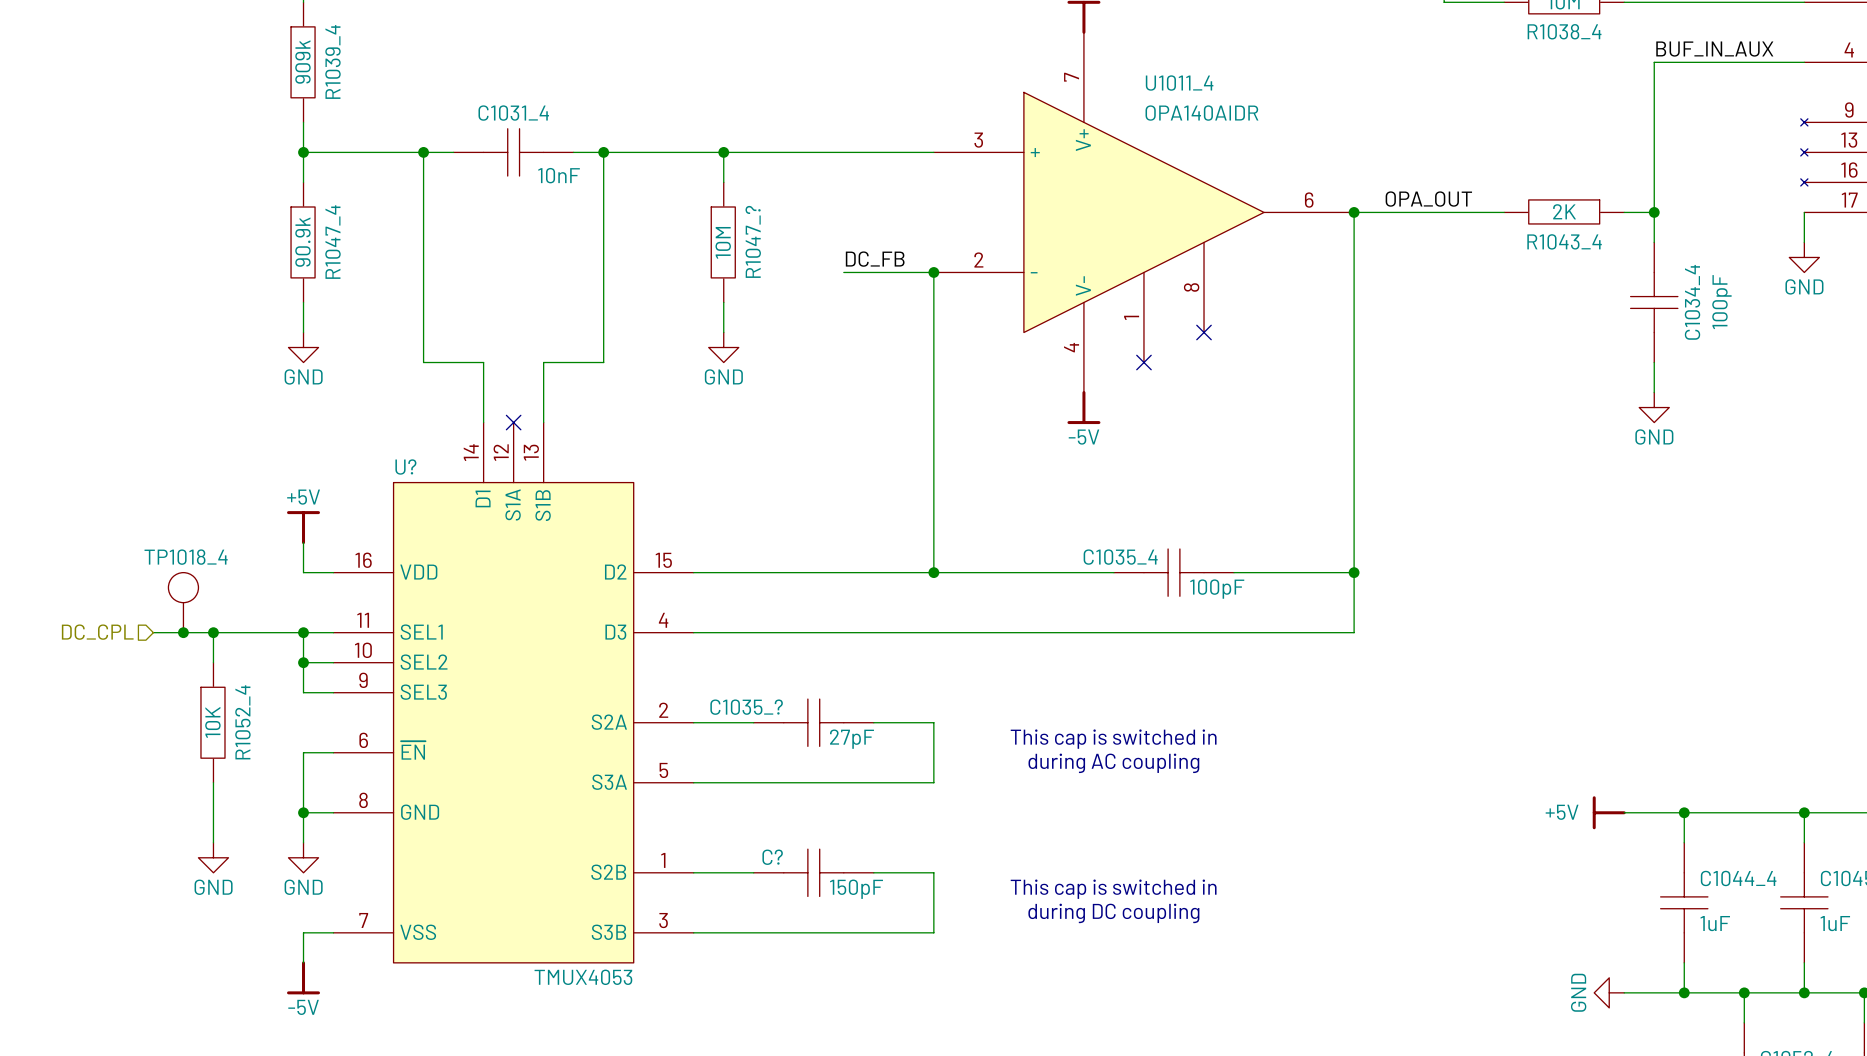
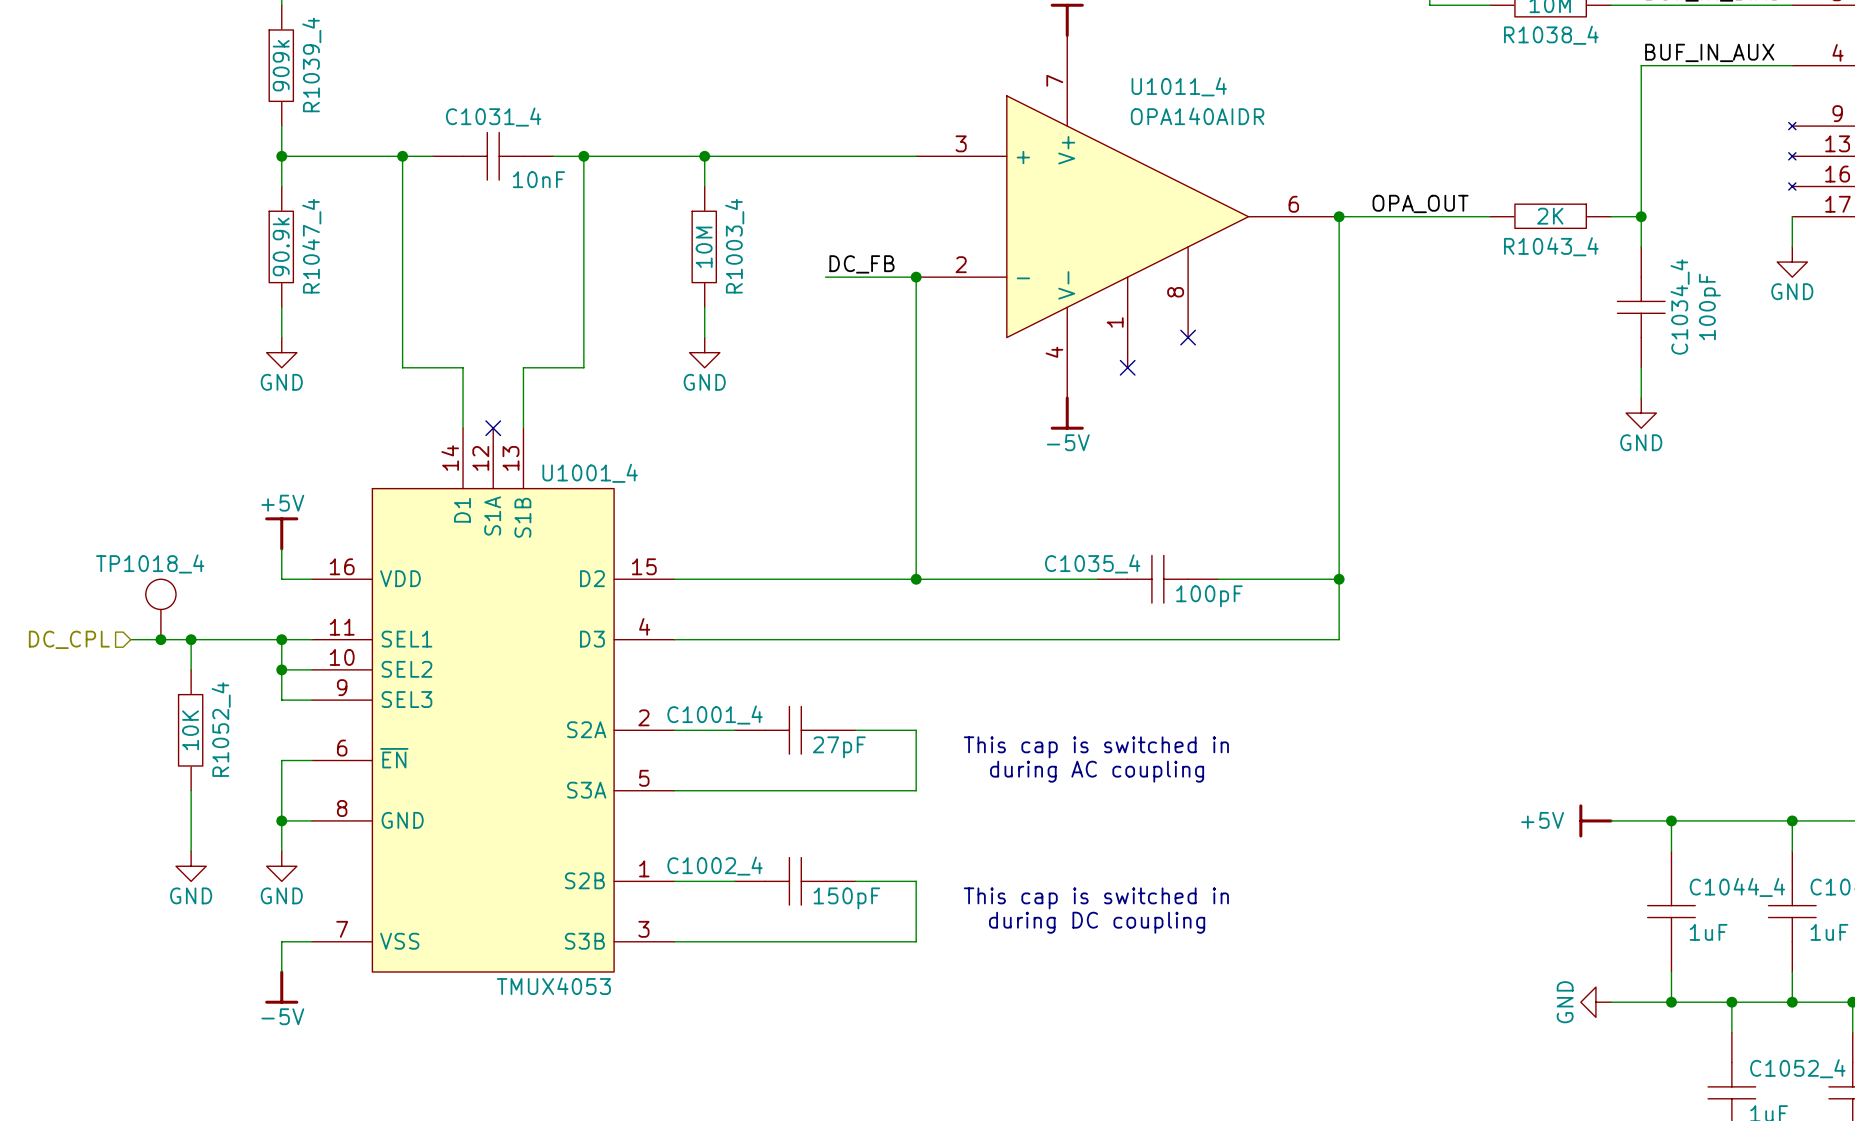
R1047_? name: R1047_? (753, 241) -> R1003_4 (734, 246)
U? name: U? (405, 467) -> U1001_4 (590, 473)
C1035_? name: C1035_? (746, 707) -> C1001_4 (715, 715)
C? name: C? (772, 857) -> C1002_4 (715, 866)

